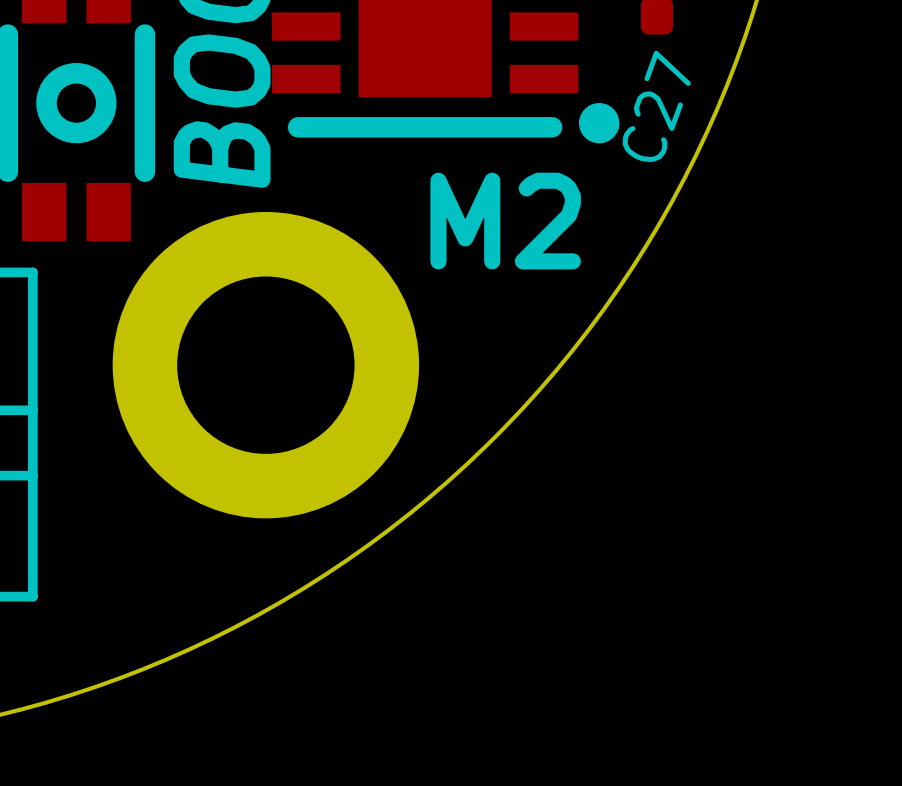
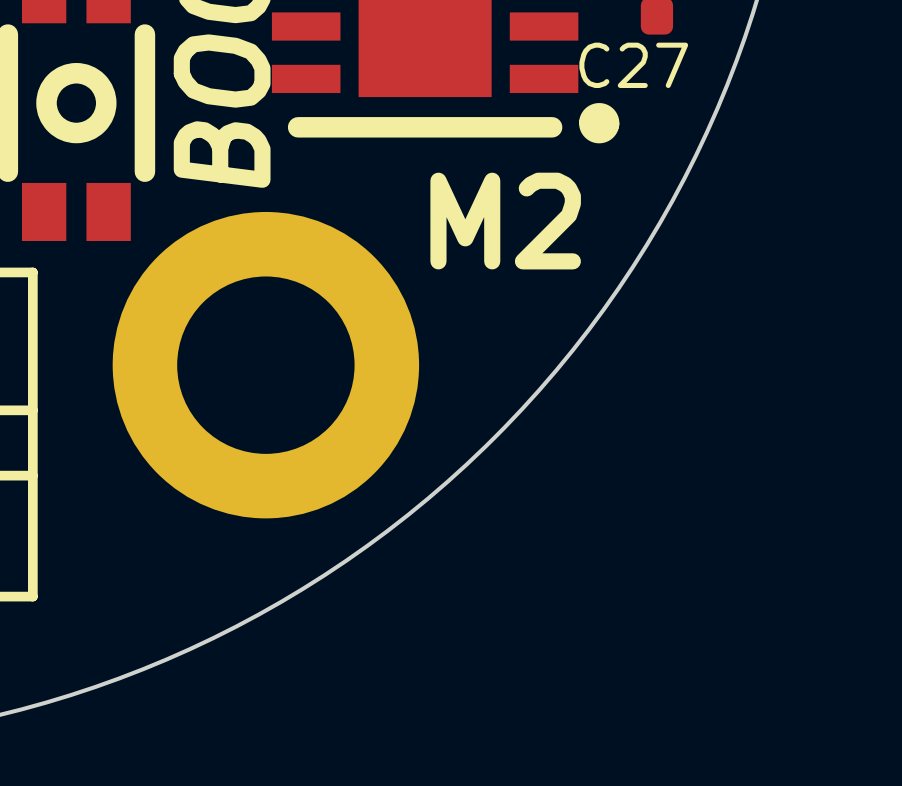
C27 name rotation: 0° (656, 106) -> 70° clockwise (633, 65)

